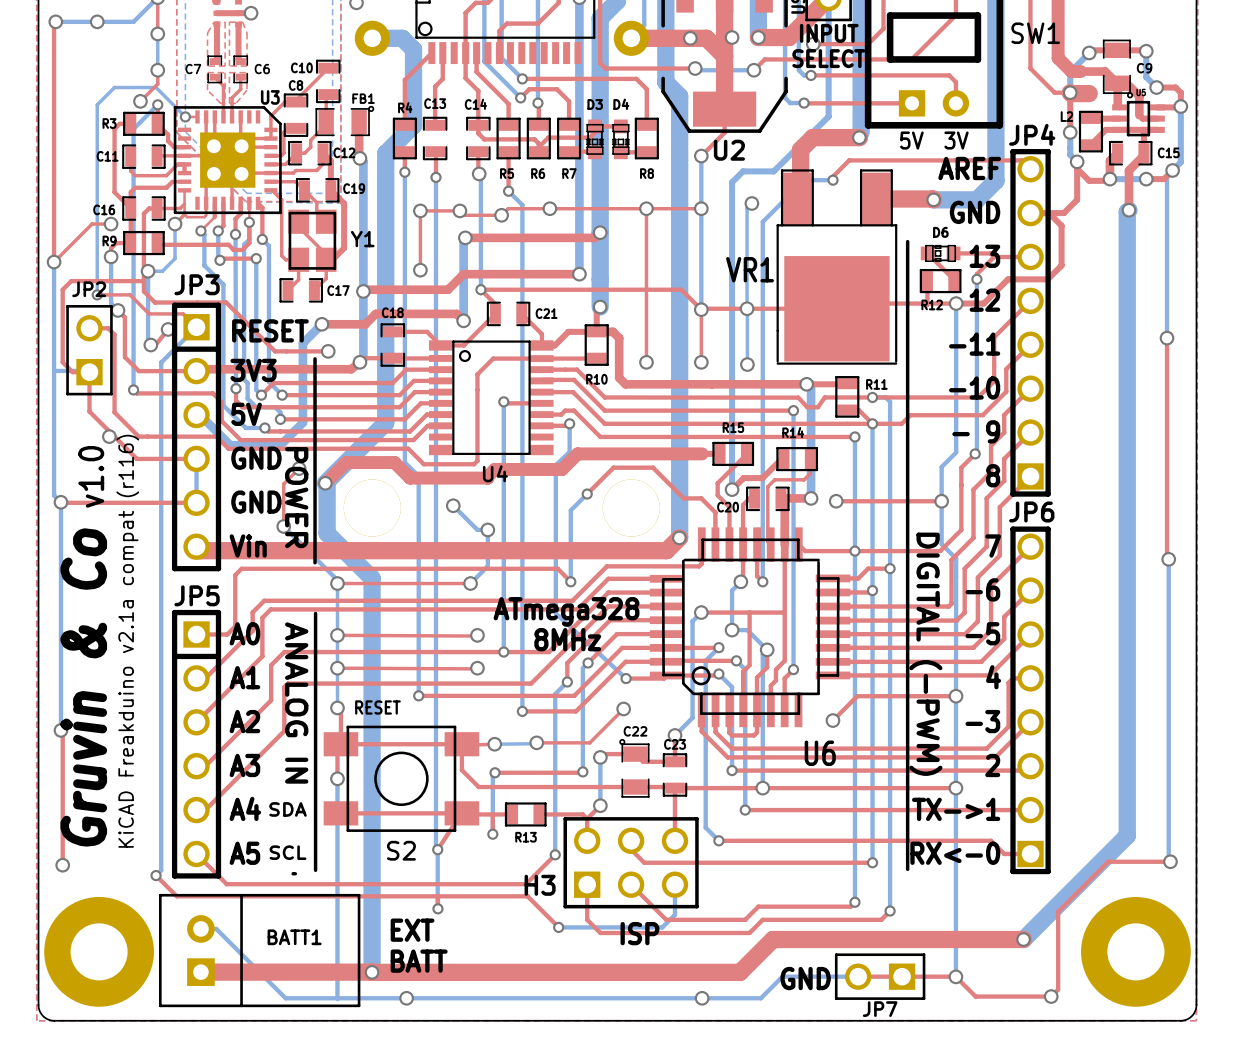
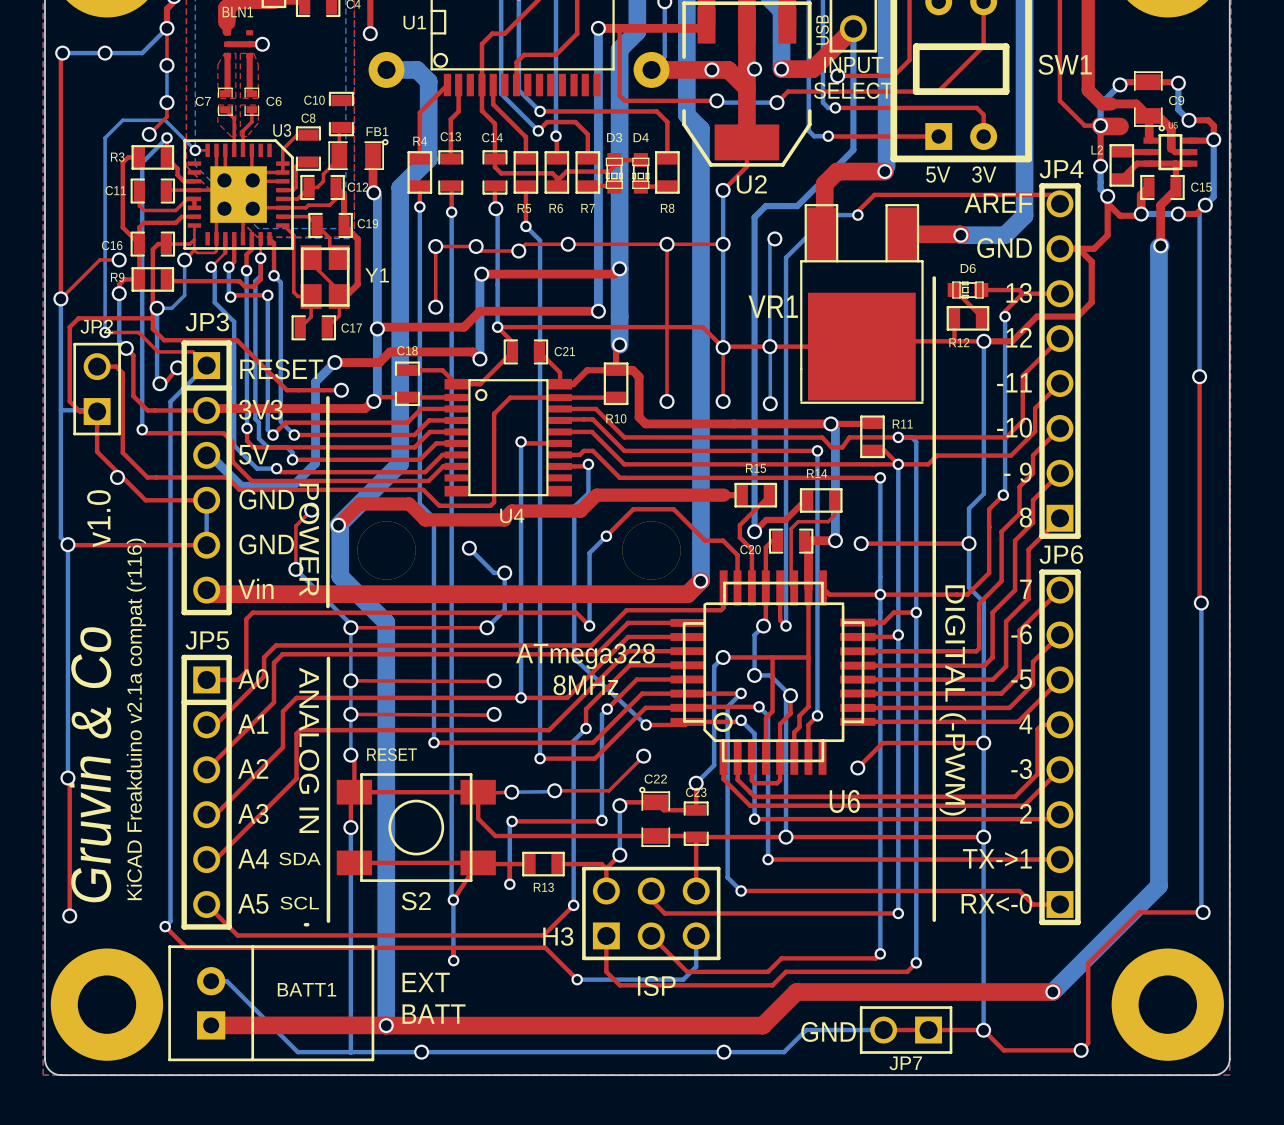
top track: (328, 68) (296, 102) -> none

